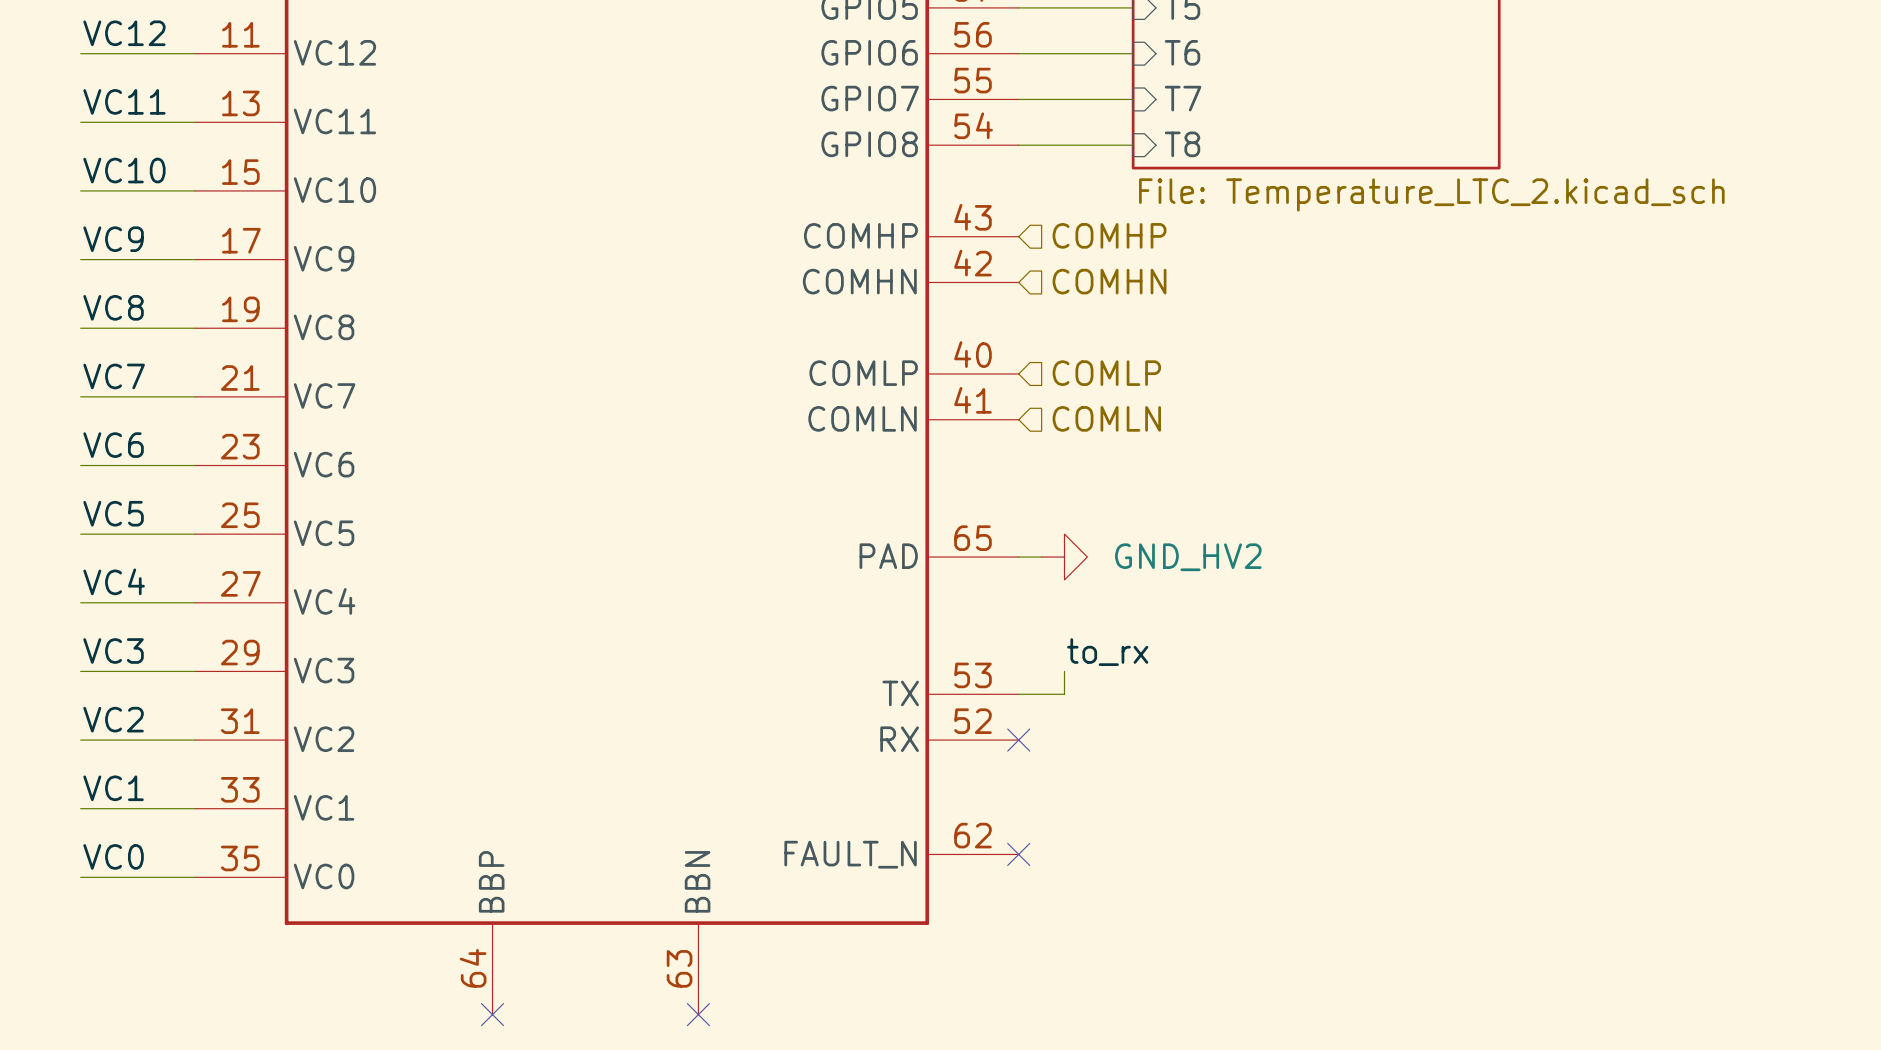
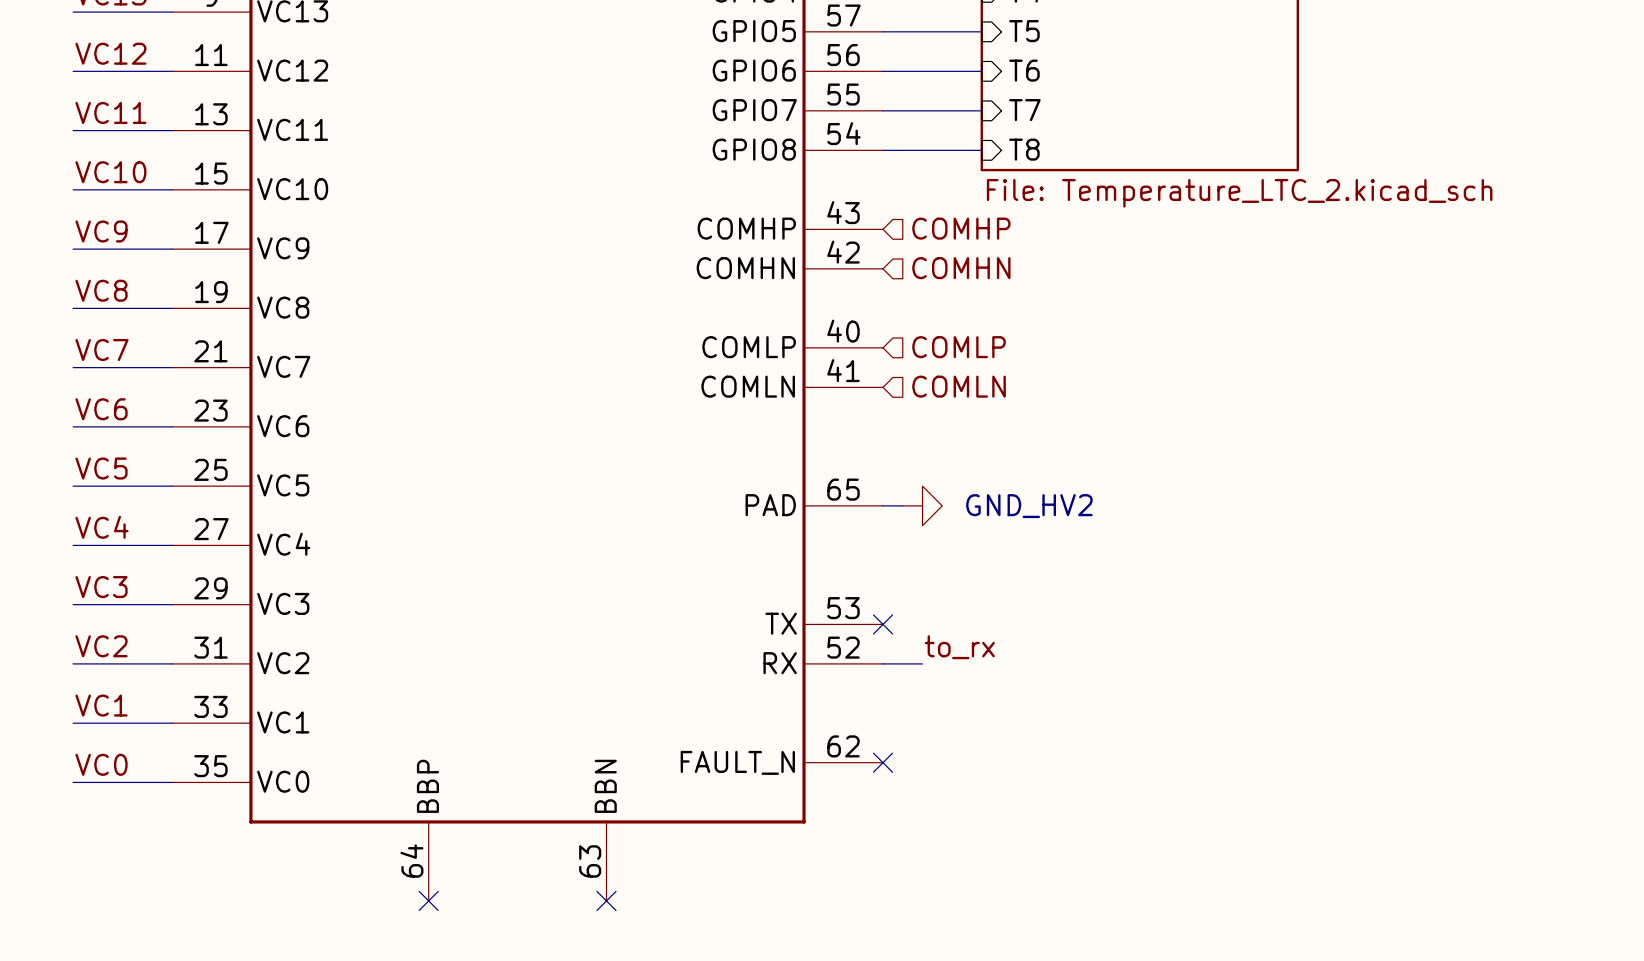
label position: to_rx (1107, 652) -> to_rx (959, 647)
wire: (1064, 671) (1064, 694) (1018, 694) -> none
wire: none -> (883, 663) (922, 663)
no-connect mark position: (1018, 740) -> (883, 624)

